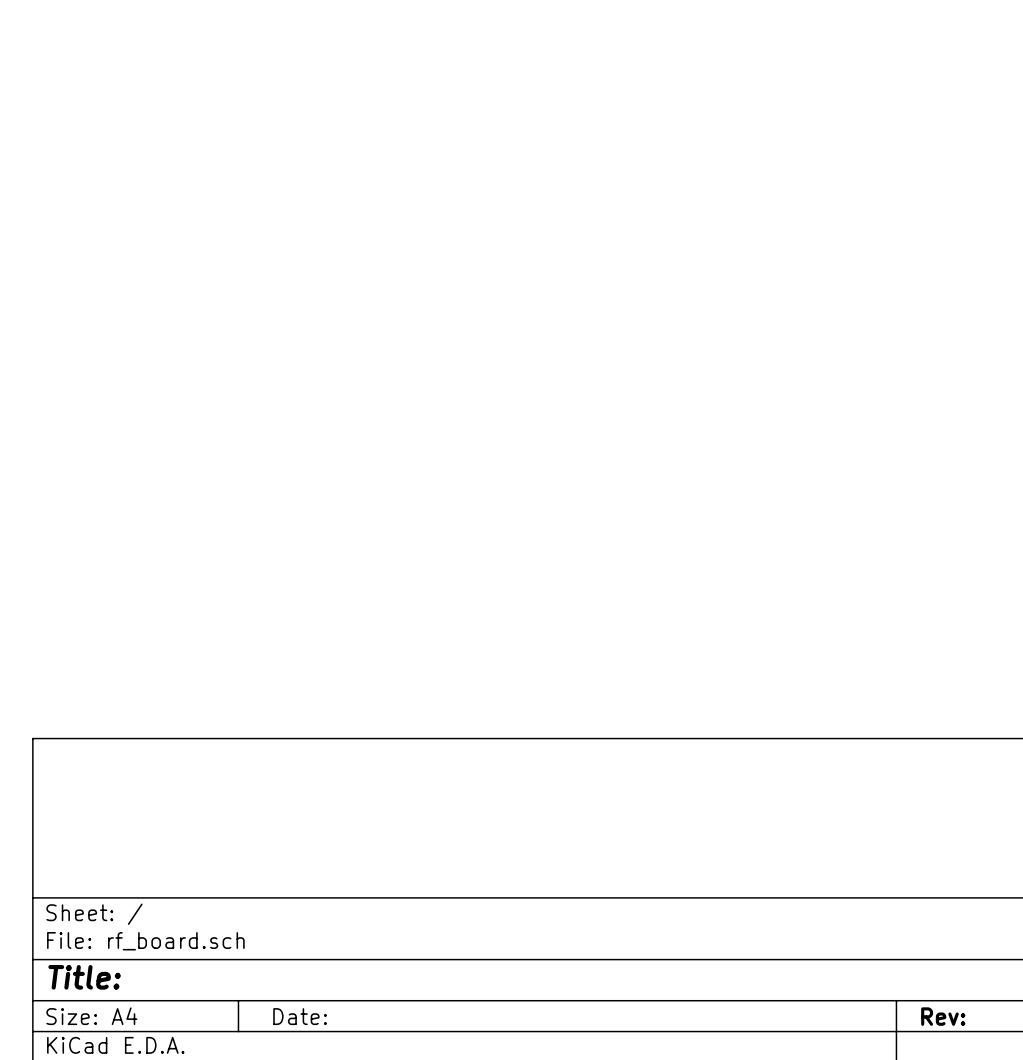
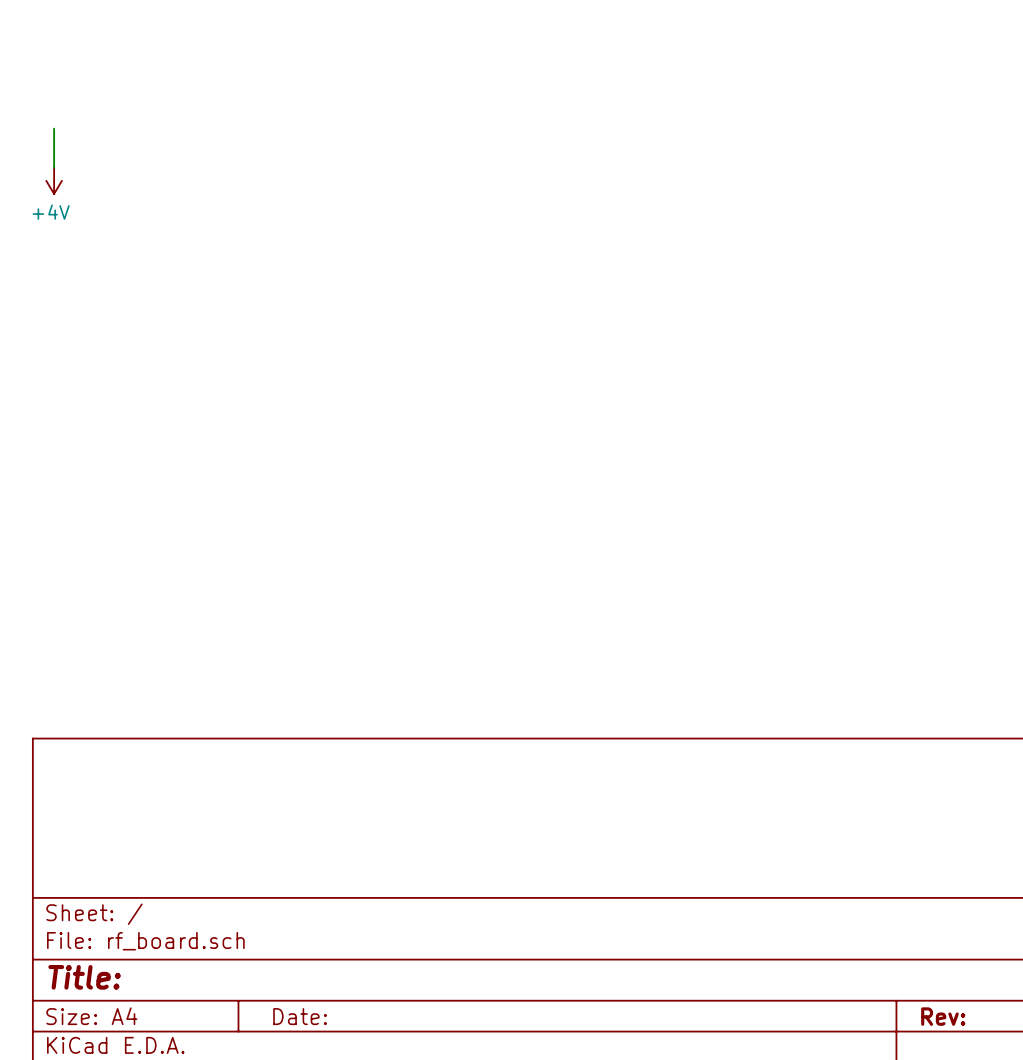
wire: none -> (54, 128) (54, 167)
power symbol: none -> +4V (54, 180)

